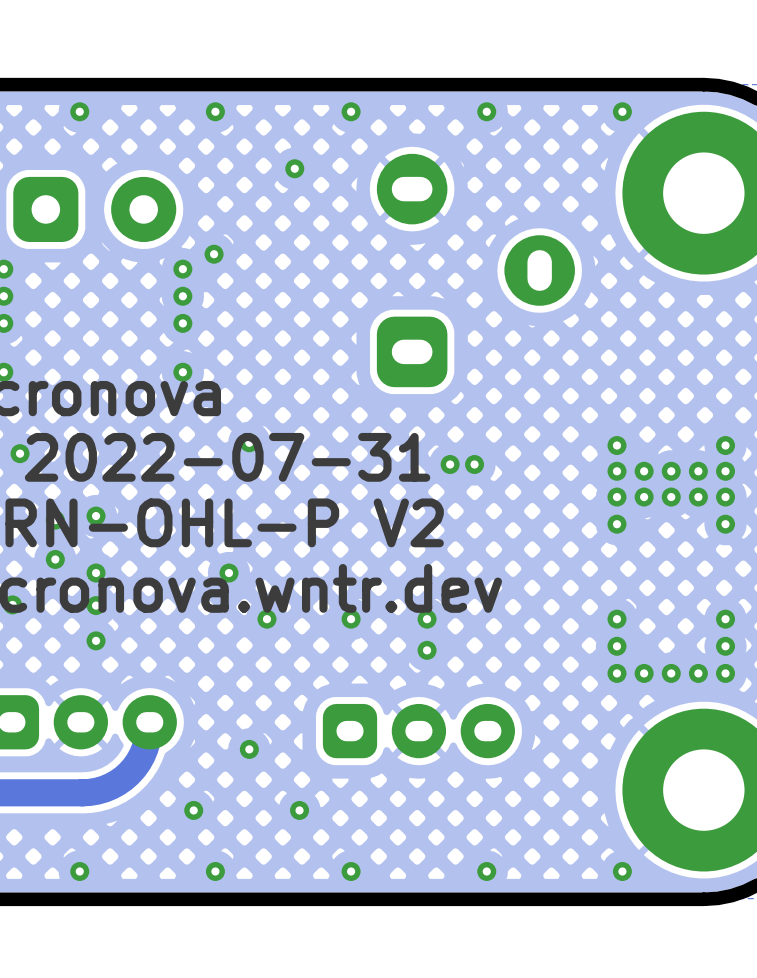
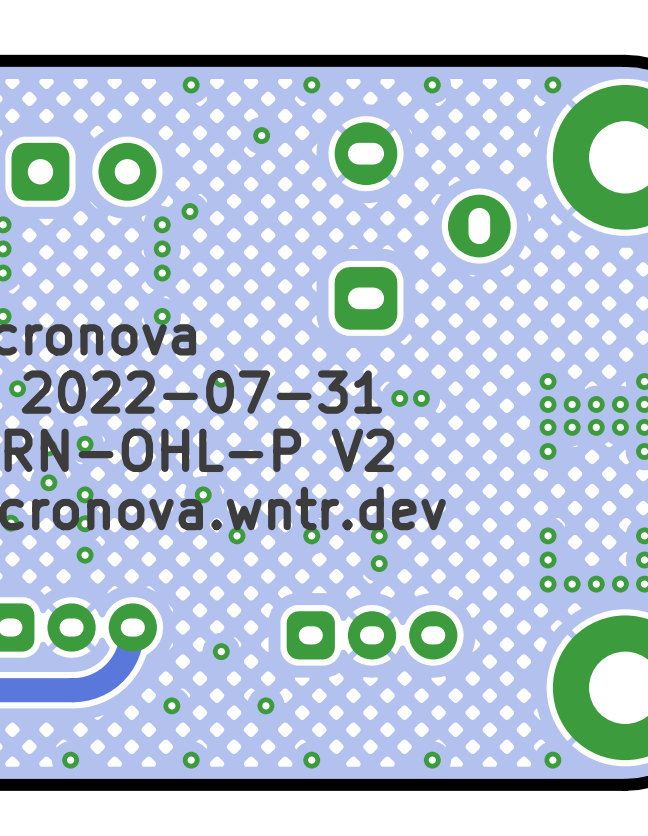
via: (79, 111) -> none

